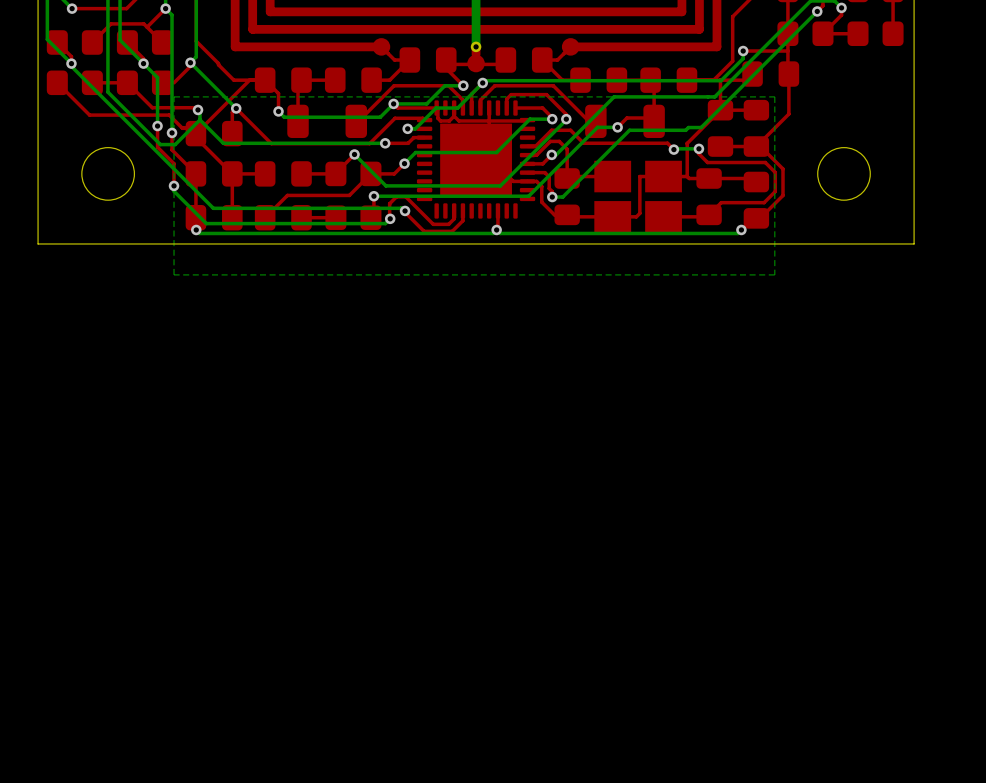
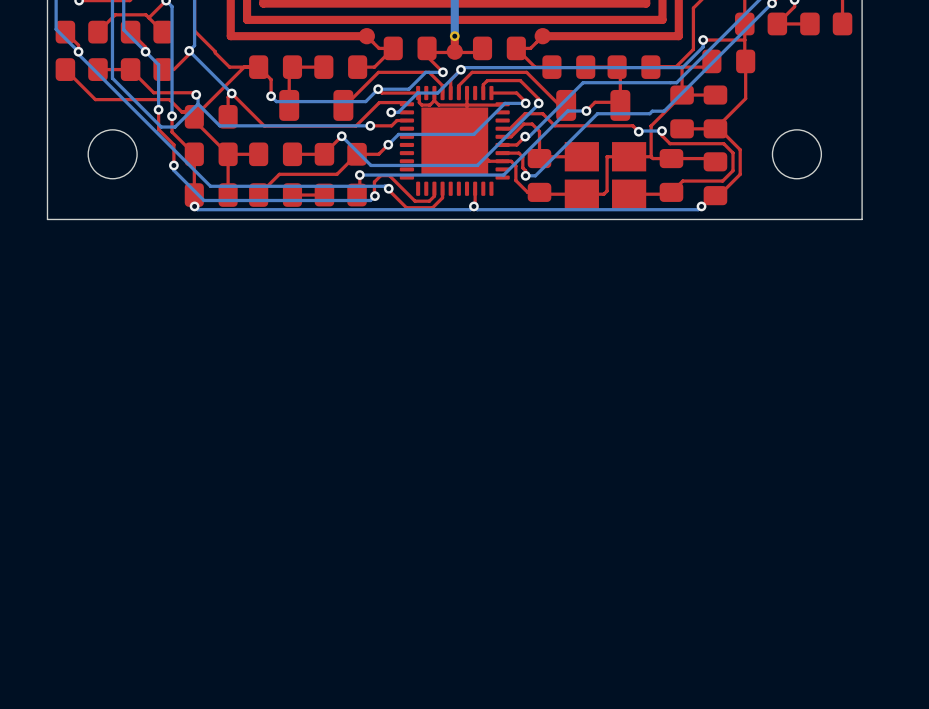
bottom zone outline: (774, 96) (774, 274) (174, 274) (174, 96) (774, 96) -> none

